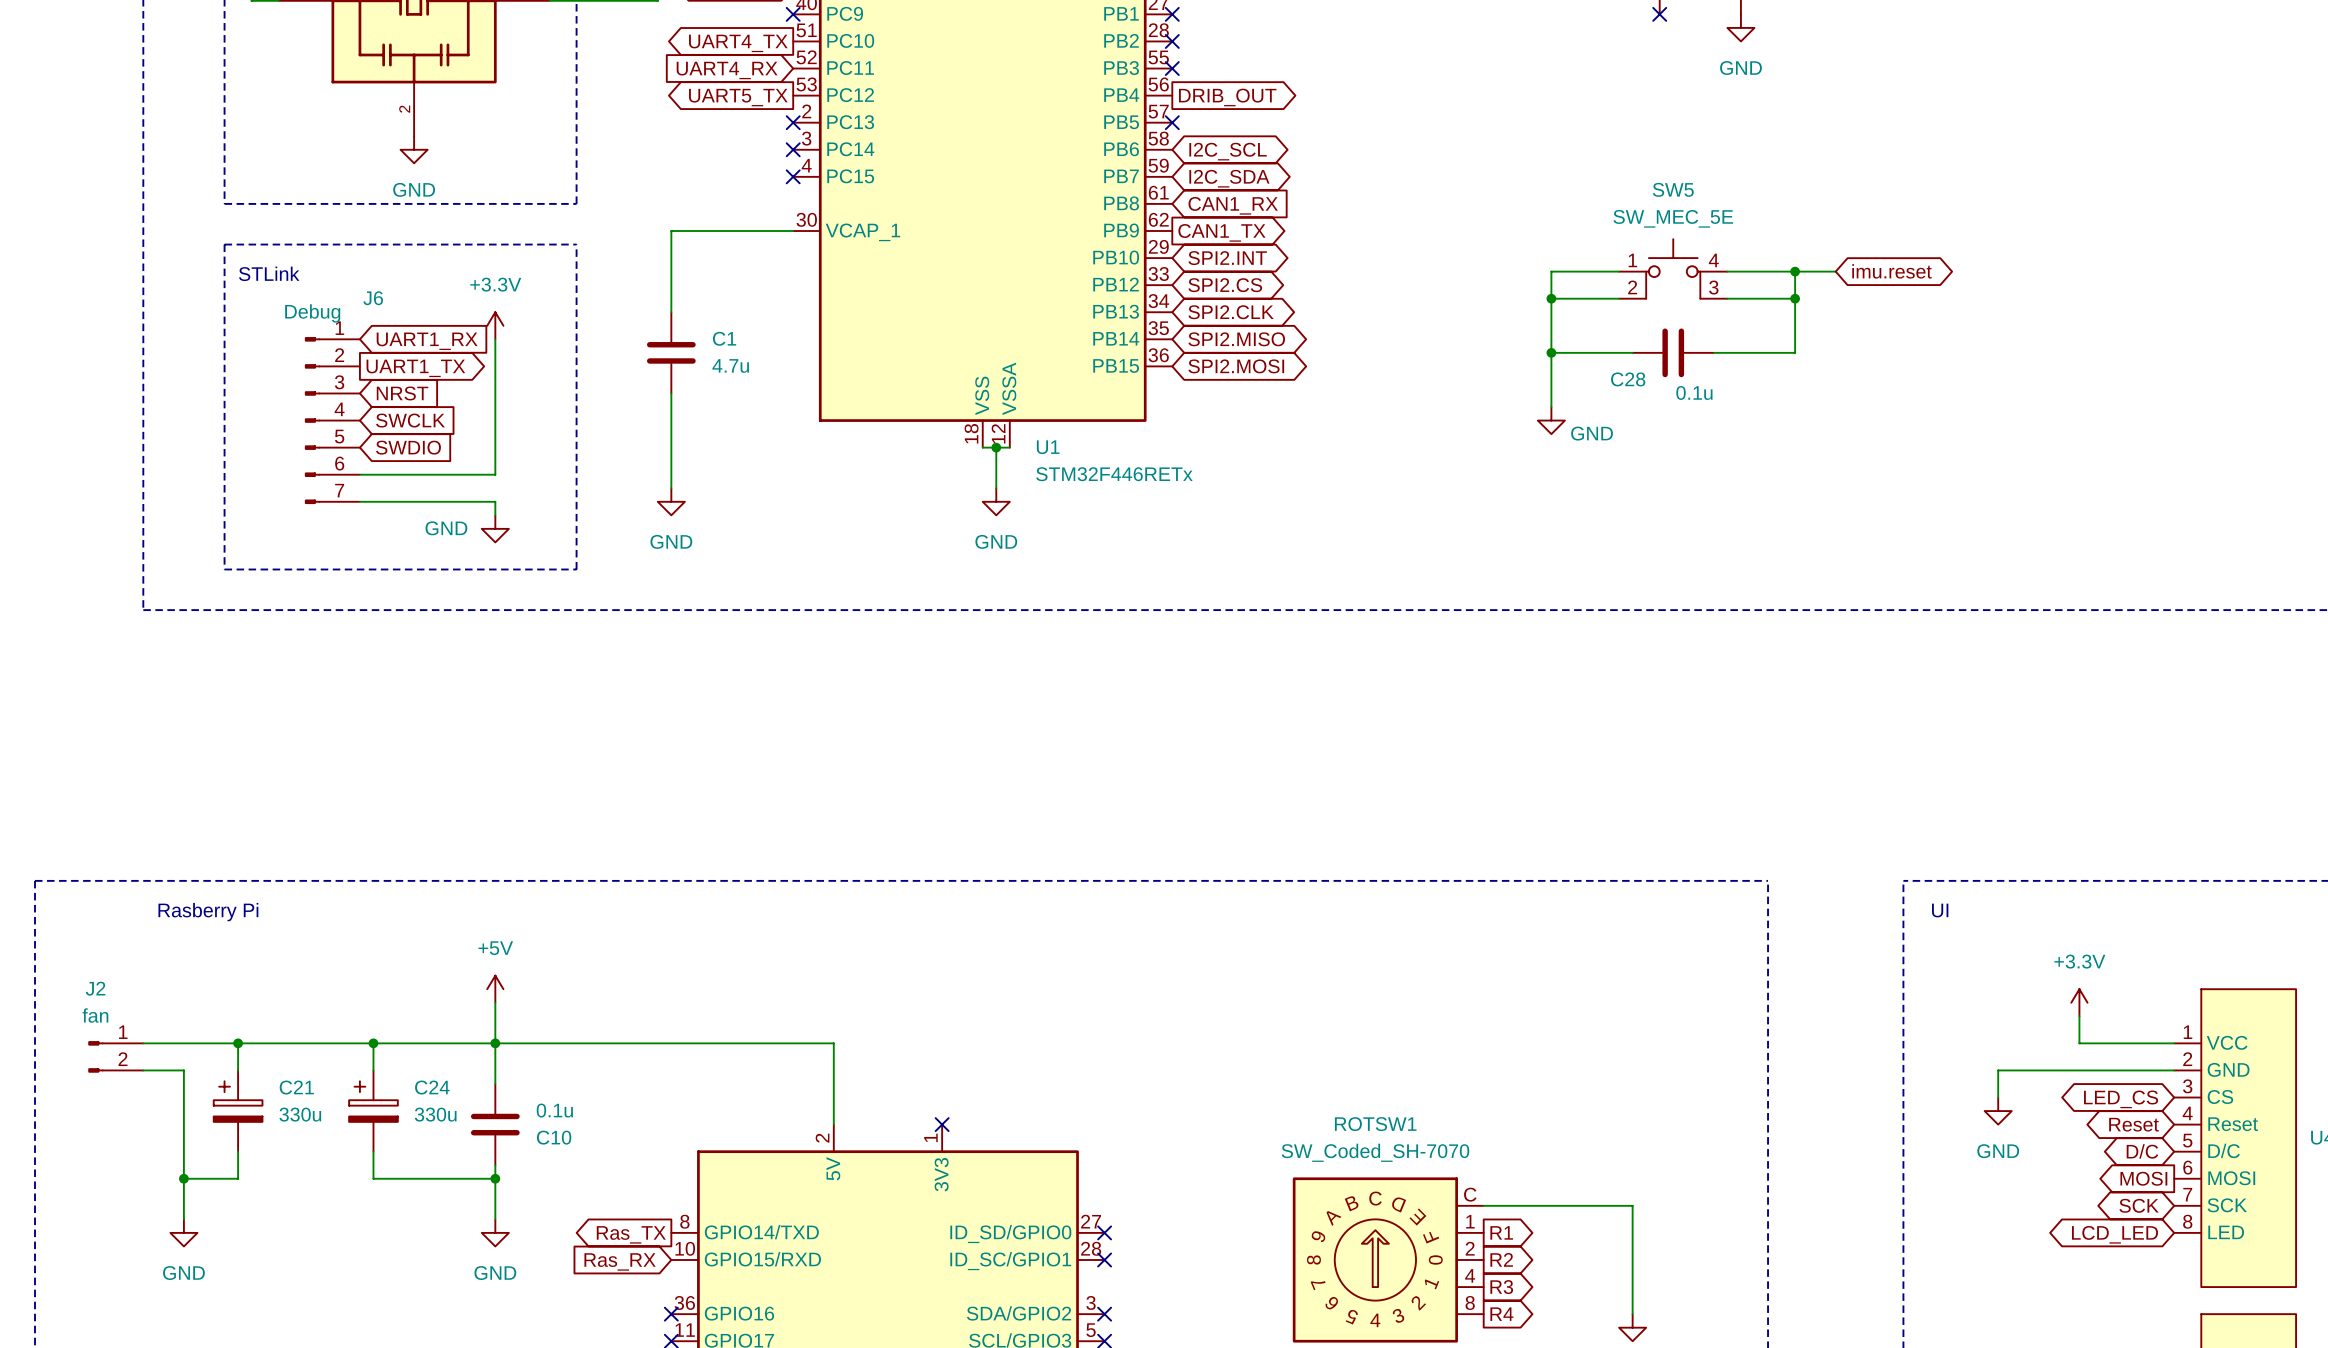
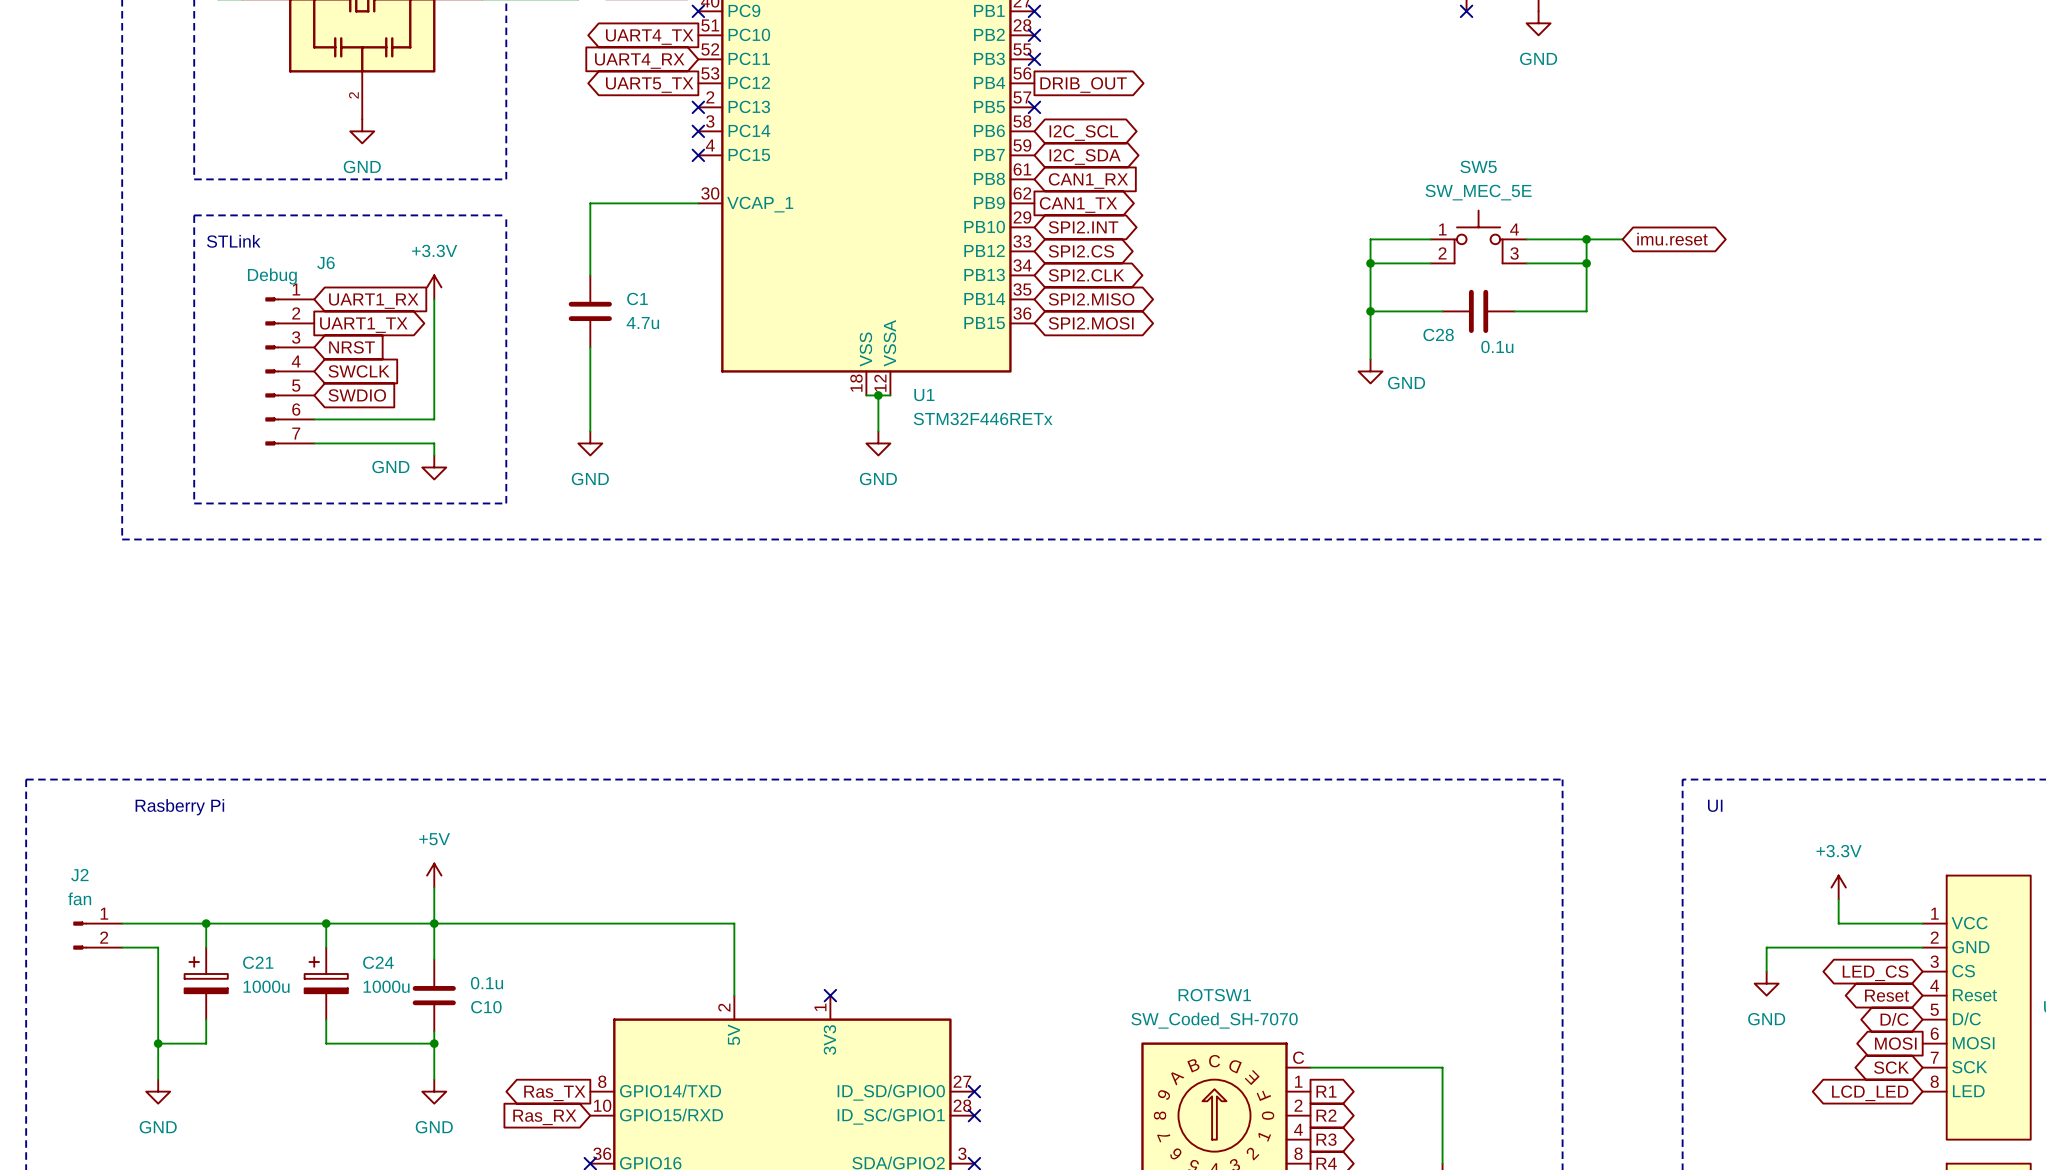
C21 value: 330u (300, 1114) -> 1000u (266, 986)
C24 value: 330u (435, 1114) -> 1000u (386, 986)

